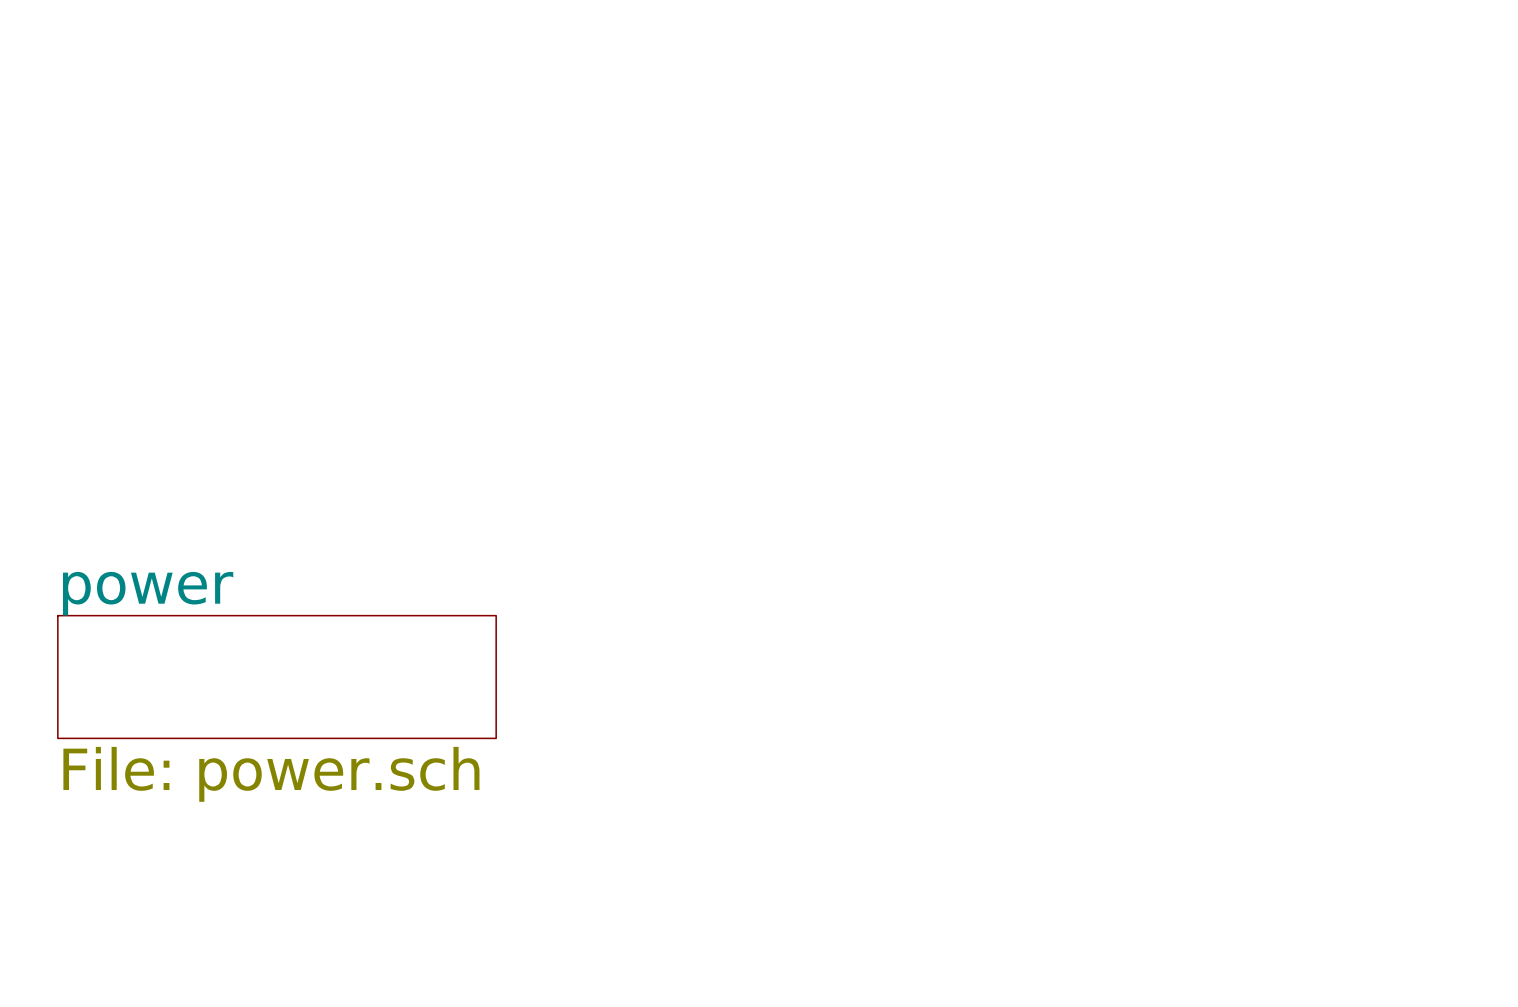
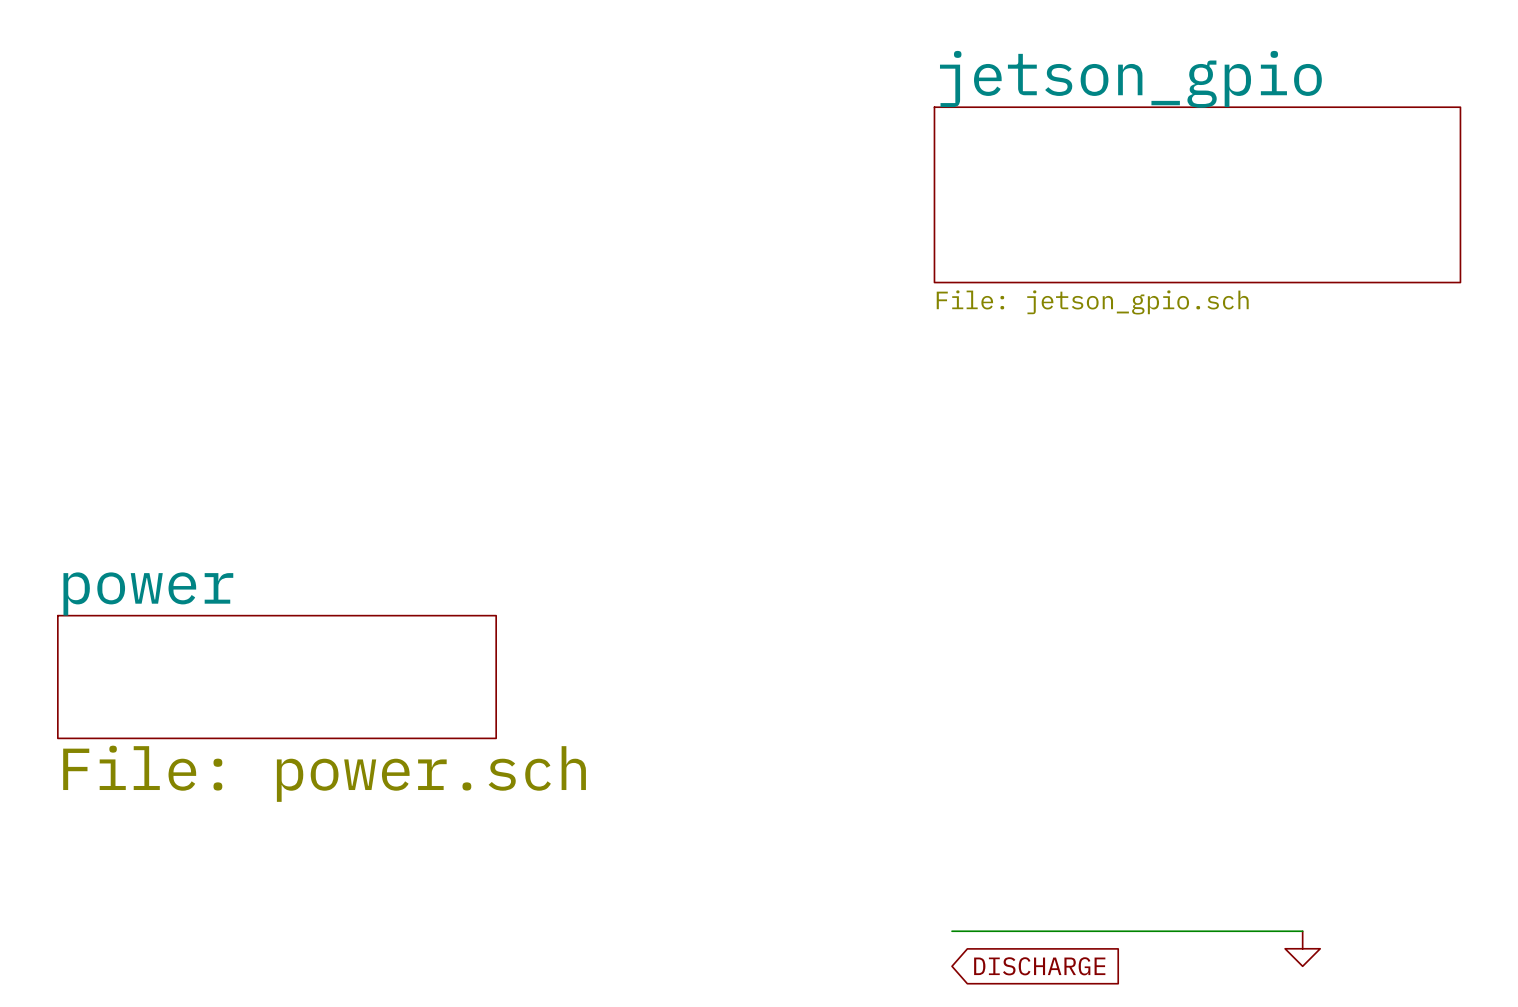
sheet jetson_gpio: none -> File: jetson_gpio.sch (1197, 194)
wire: none -> (952, 931) (1302, 931)
power symbol: none -> (1302, 948)
global label: none -> DISCHARGE (1039, 966)

